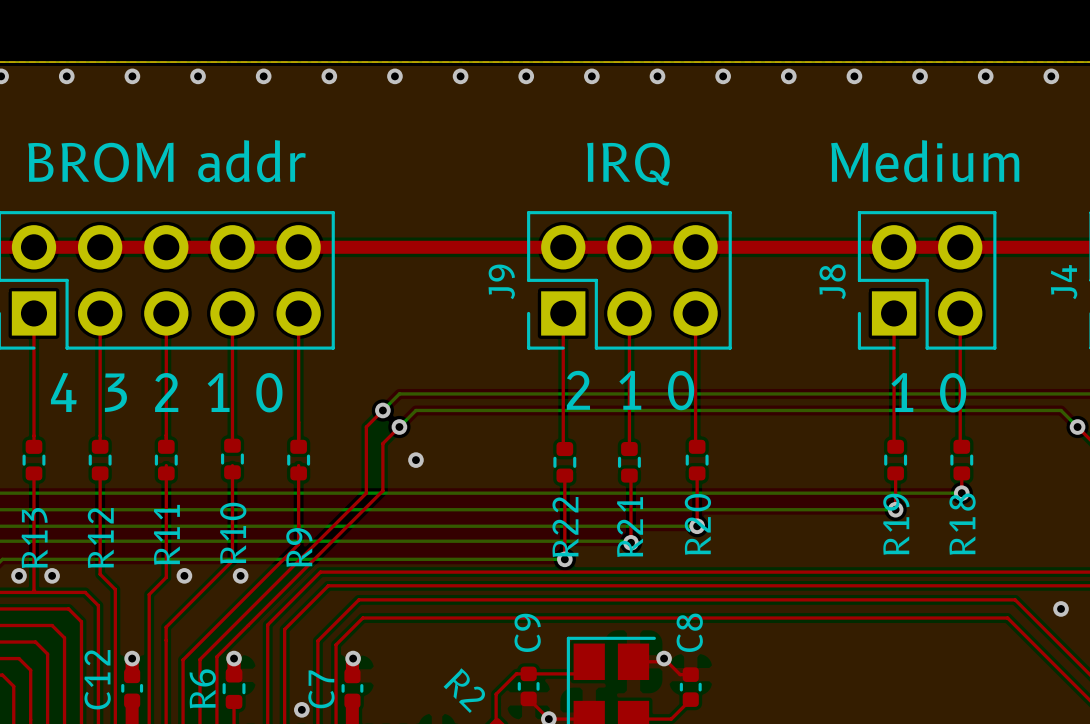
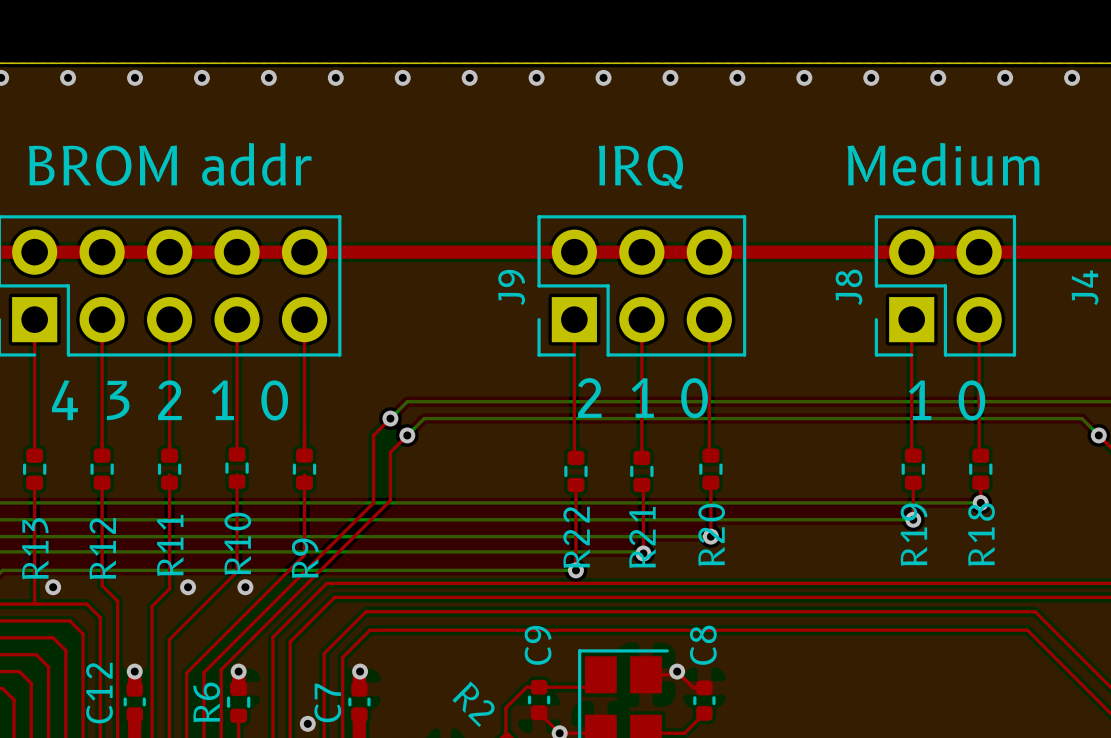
via: (415, 460) -> none
via: (19, 575) -> none
via: (1061, 608) -> none

